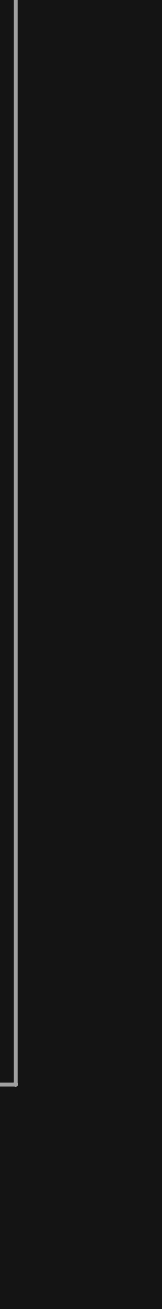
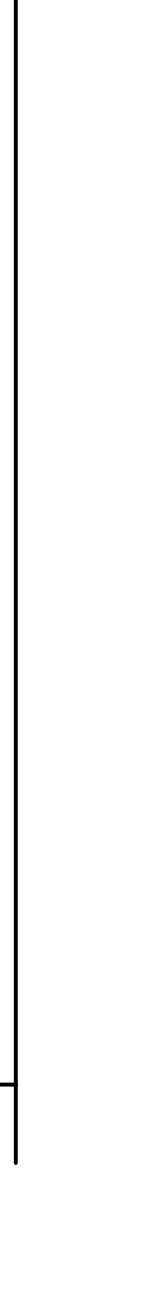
board edge: none -> (15, 1084) (15, 1163)

